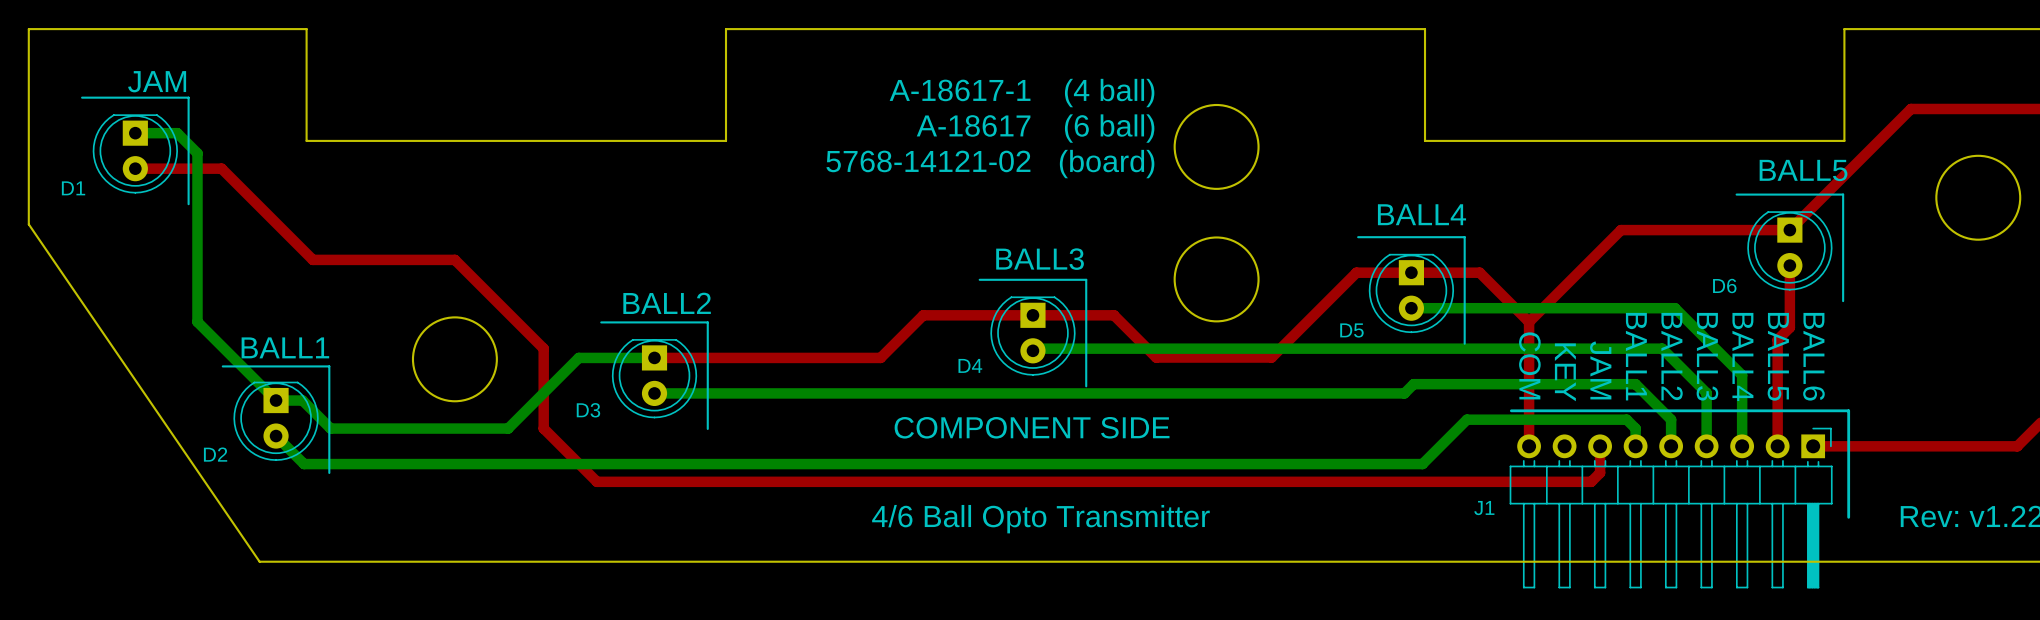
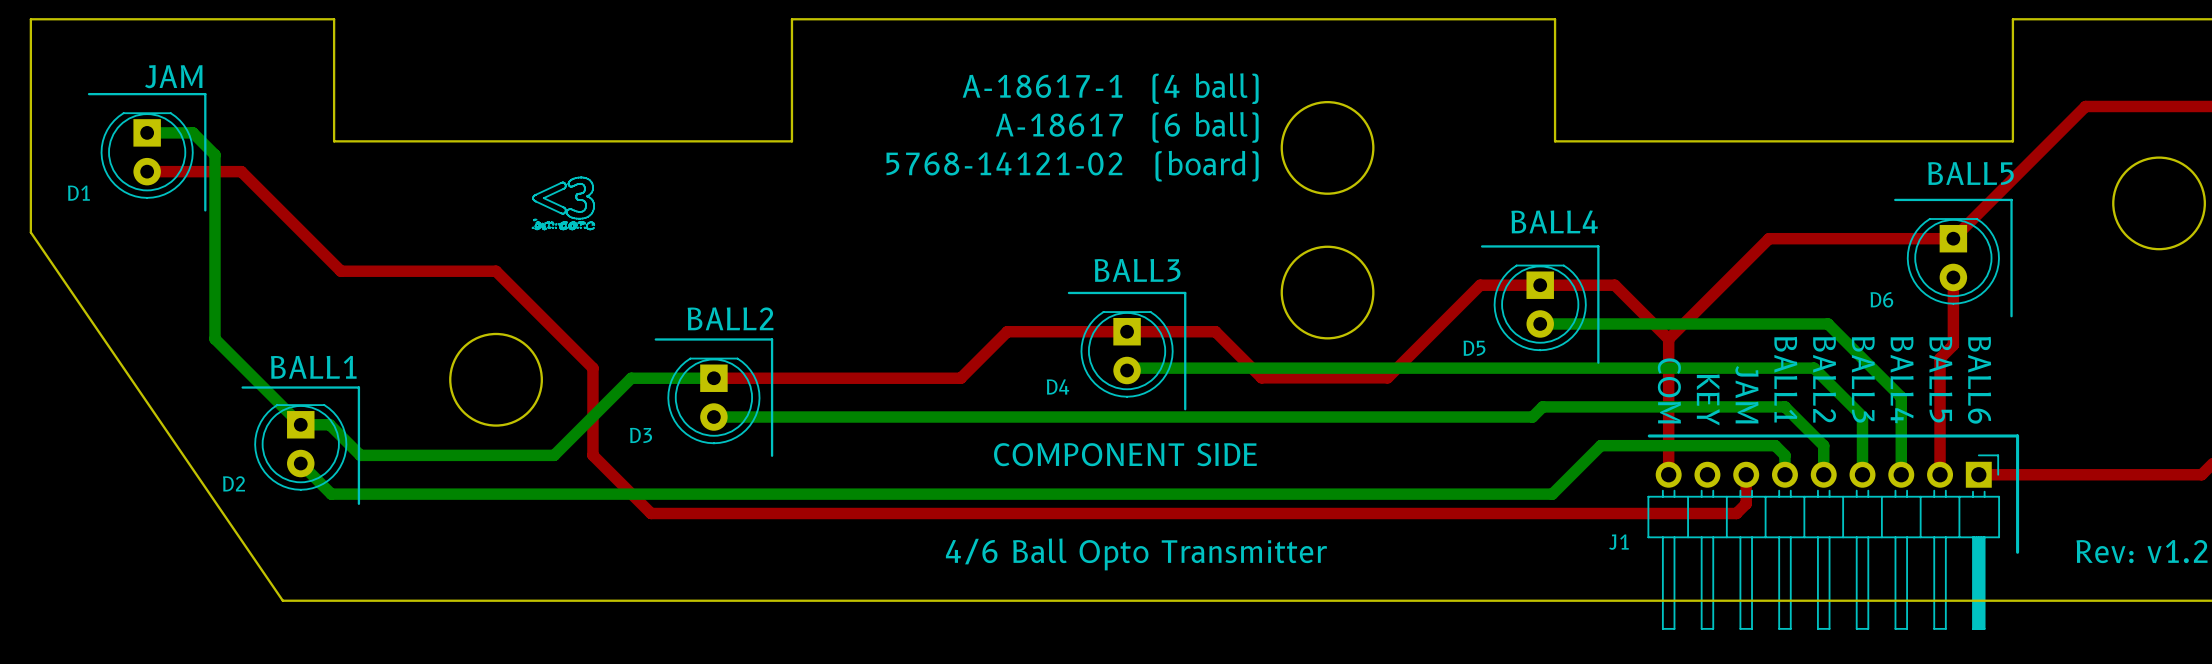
line: none -> (560, 183) (565, 184) (563, 188)
line: none -> (560, 183) (533, 197) (535, 201) (560, 213)
line: none -> (563, 188) (543, 198) (563, 207)
line: none -> (579, 193) (584, 191) (583, 185) (578, 183) (570, 186) (568, 182) (576, 178) (588, 179) (592, 183) (593, 188) (591, 192) (586, 196) (593, 201) (593, 211) (585, 217) (570, 216) (566, 212) (568, 209) (580, 211) (585, 208) (585, 201) (579, 199)
line: none -> (579, 193) (576, 196) (579, 199)
line: none -> (563, 207) (565, 211) (560, 213)
line: none -> (536, 219) (534, 220)
line: none -> (536, 222) (539, 222) (540, 225) (538, 228) (535, 228)
line: none -> (545, 222) (544, 226)
line: none -> (549, 222) (546, 222)
line: none -> (549, 222) (548, 227)
line: none -> (553, 222) (550, 223)
line: none -> (567, 222) (566, 222)
line: none -> (566, 222) (561, 223) (559, 227) (562, 229) (567, 227)
line: none -> (573, 222) (576, 226) (570, 228) (569, 224) (573, 222)
line: none -> (580, 222) (578, 223)
line: none -> (581, 223) (584, 223)
line: none -> (538, 223) (535, 225) (536, 227) (538, 226) (538, 223)
line: none -> (542, 223) (543, 224)
line: none -> (543, 224) (543, 228) (546, 228)
line: none -> (553, 223) (553, 224)
line: none -> (556, 223) (555, 224)
line: none -> (559, 223) (558, 224)
line: none -> (573, 223) (571, 225) (571, 227) (574, 226) (573, 223)
line: none -> (582, 223) (580, 225)
line: none -> (565, 224) (563, 224) (561, 226) (566, 226)
line: none -> (592, 224) (592, 225)
line: none -> (594, 225) (590, 222) (586, 226) (588, 229) (593, 227)
line: none -> (533, 227) (532, 228)
line: none -> (550, 227) (549, 228)
line: none -> (552, 227) (553, 228)
line: none -> (555, 227) (556, 228)
line: none -> (578, 227) (577, 228)
line: none -> (580, 227) (580, 228)
line: none -> (584, 227) (585, 228)

